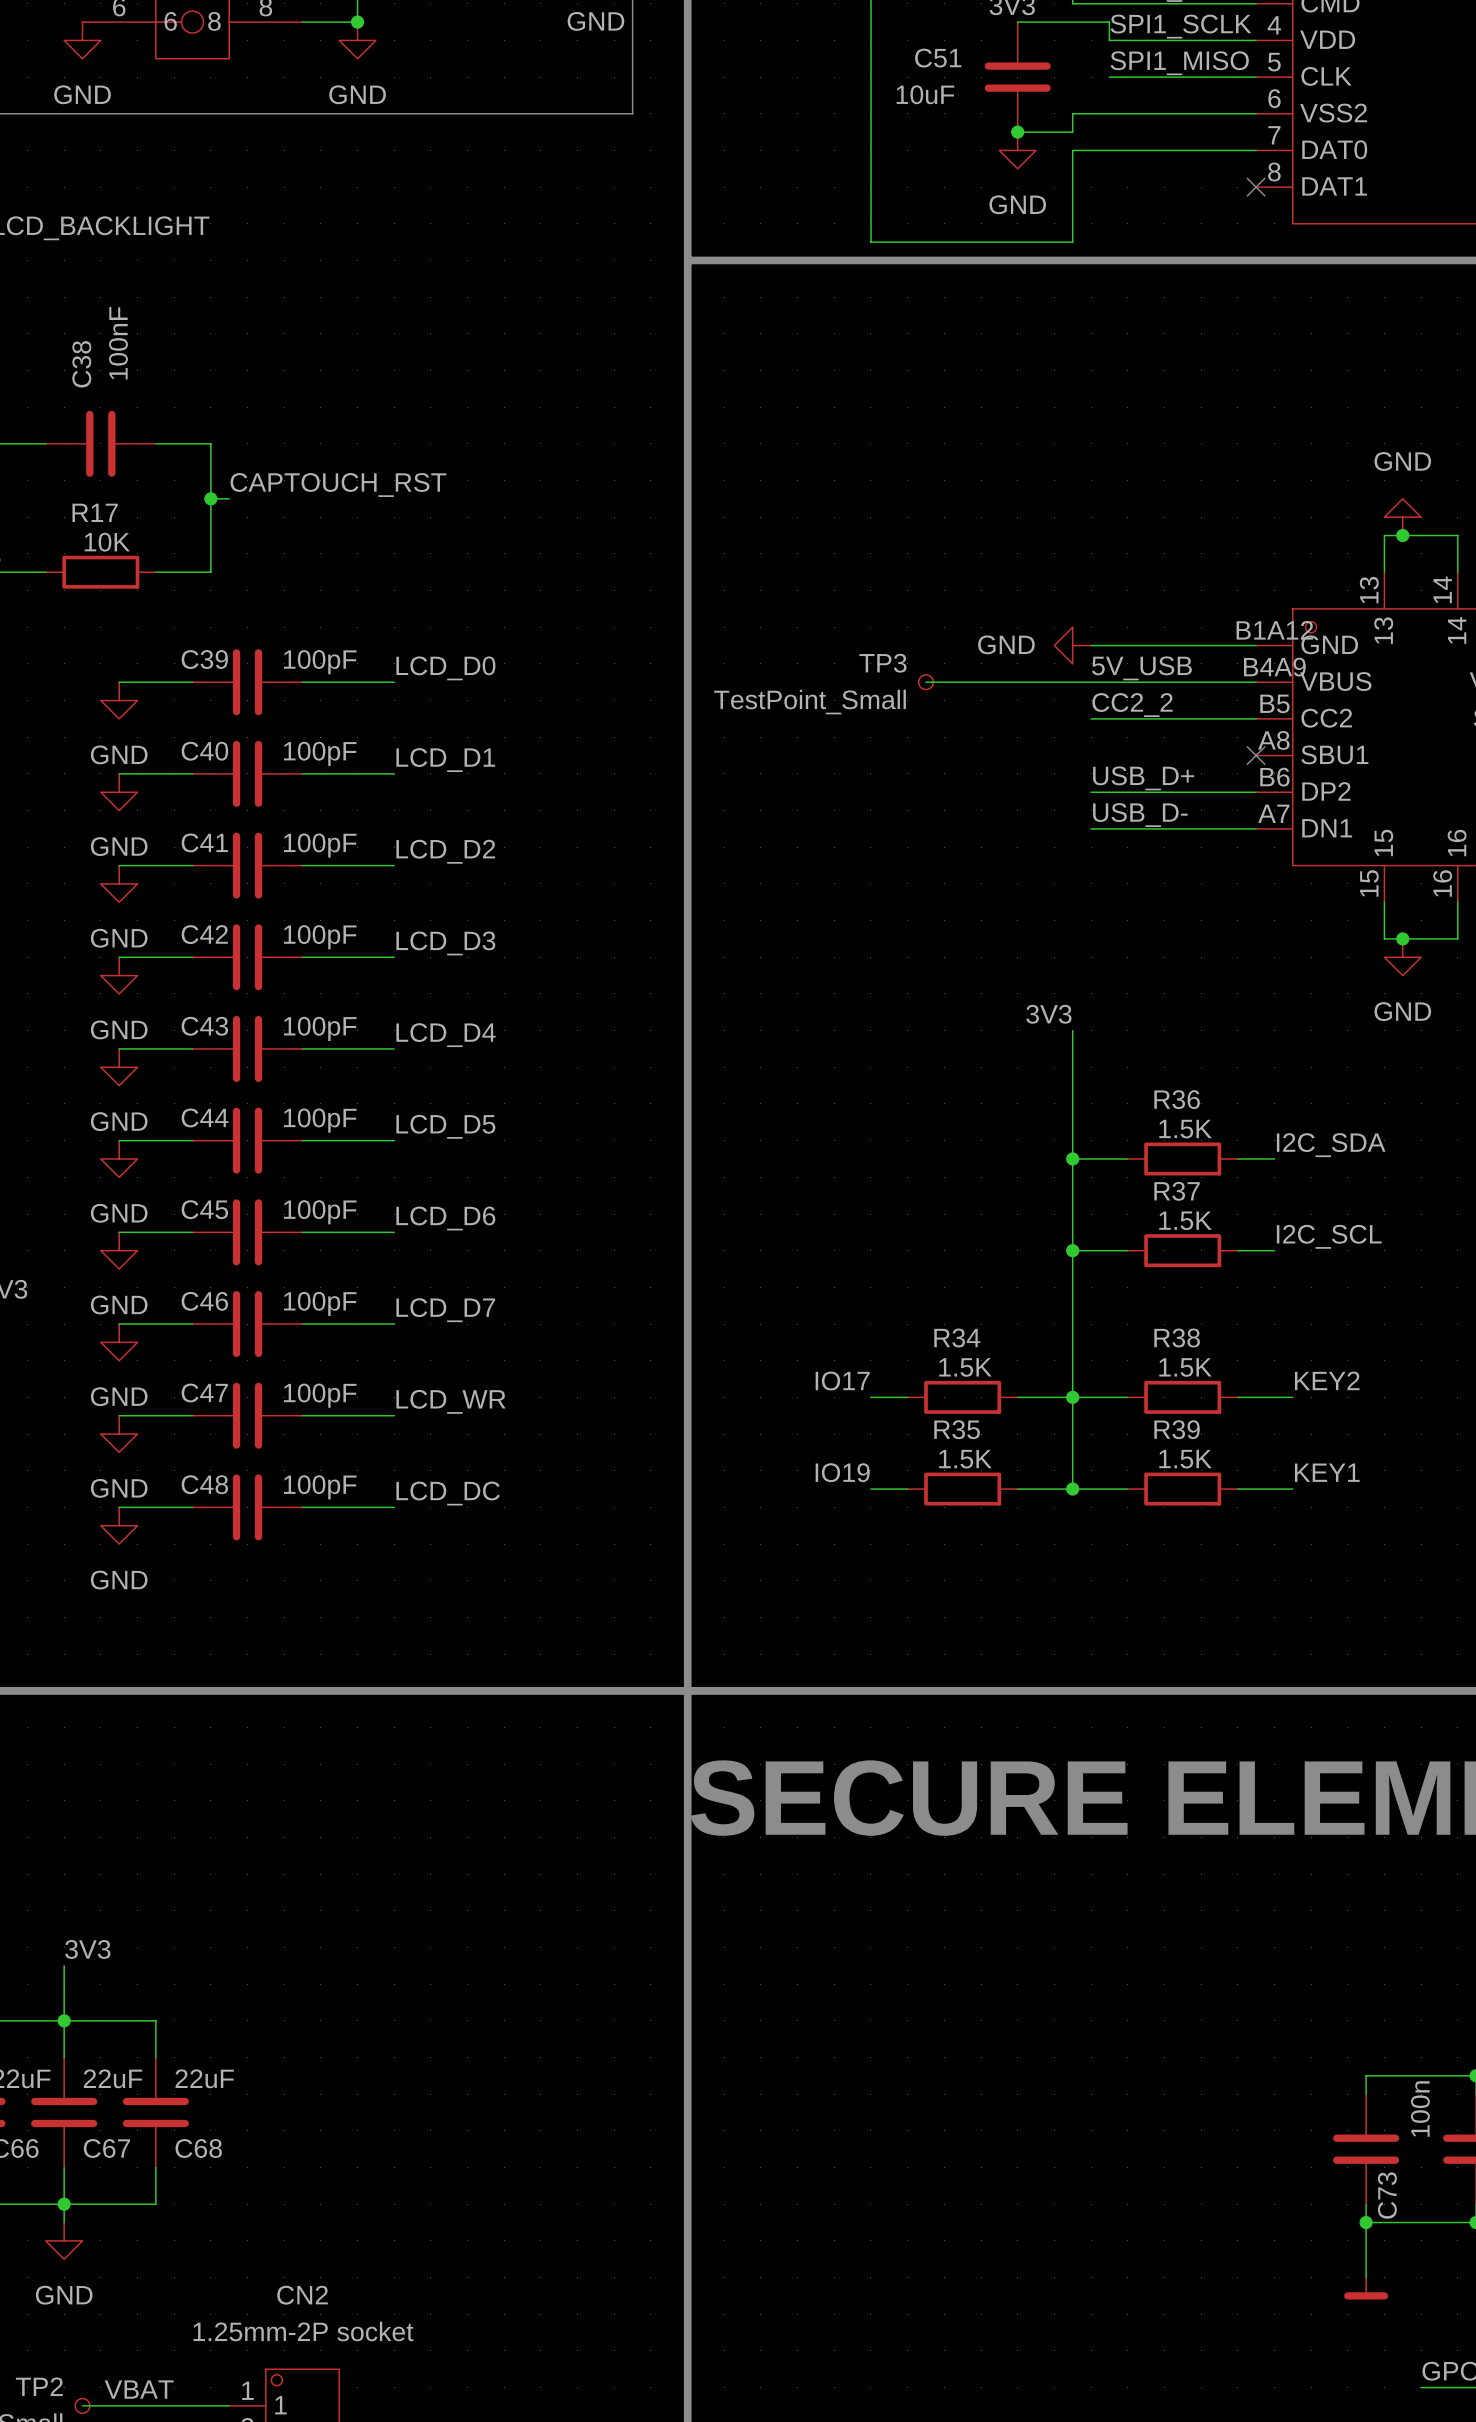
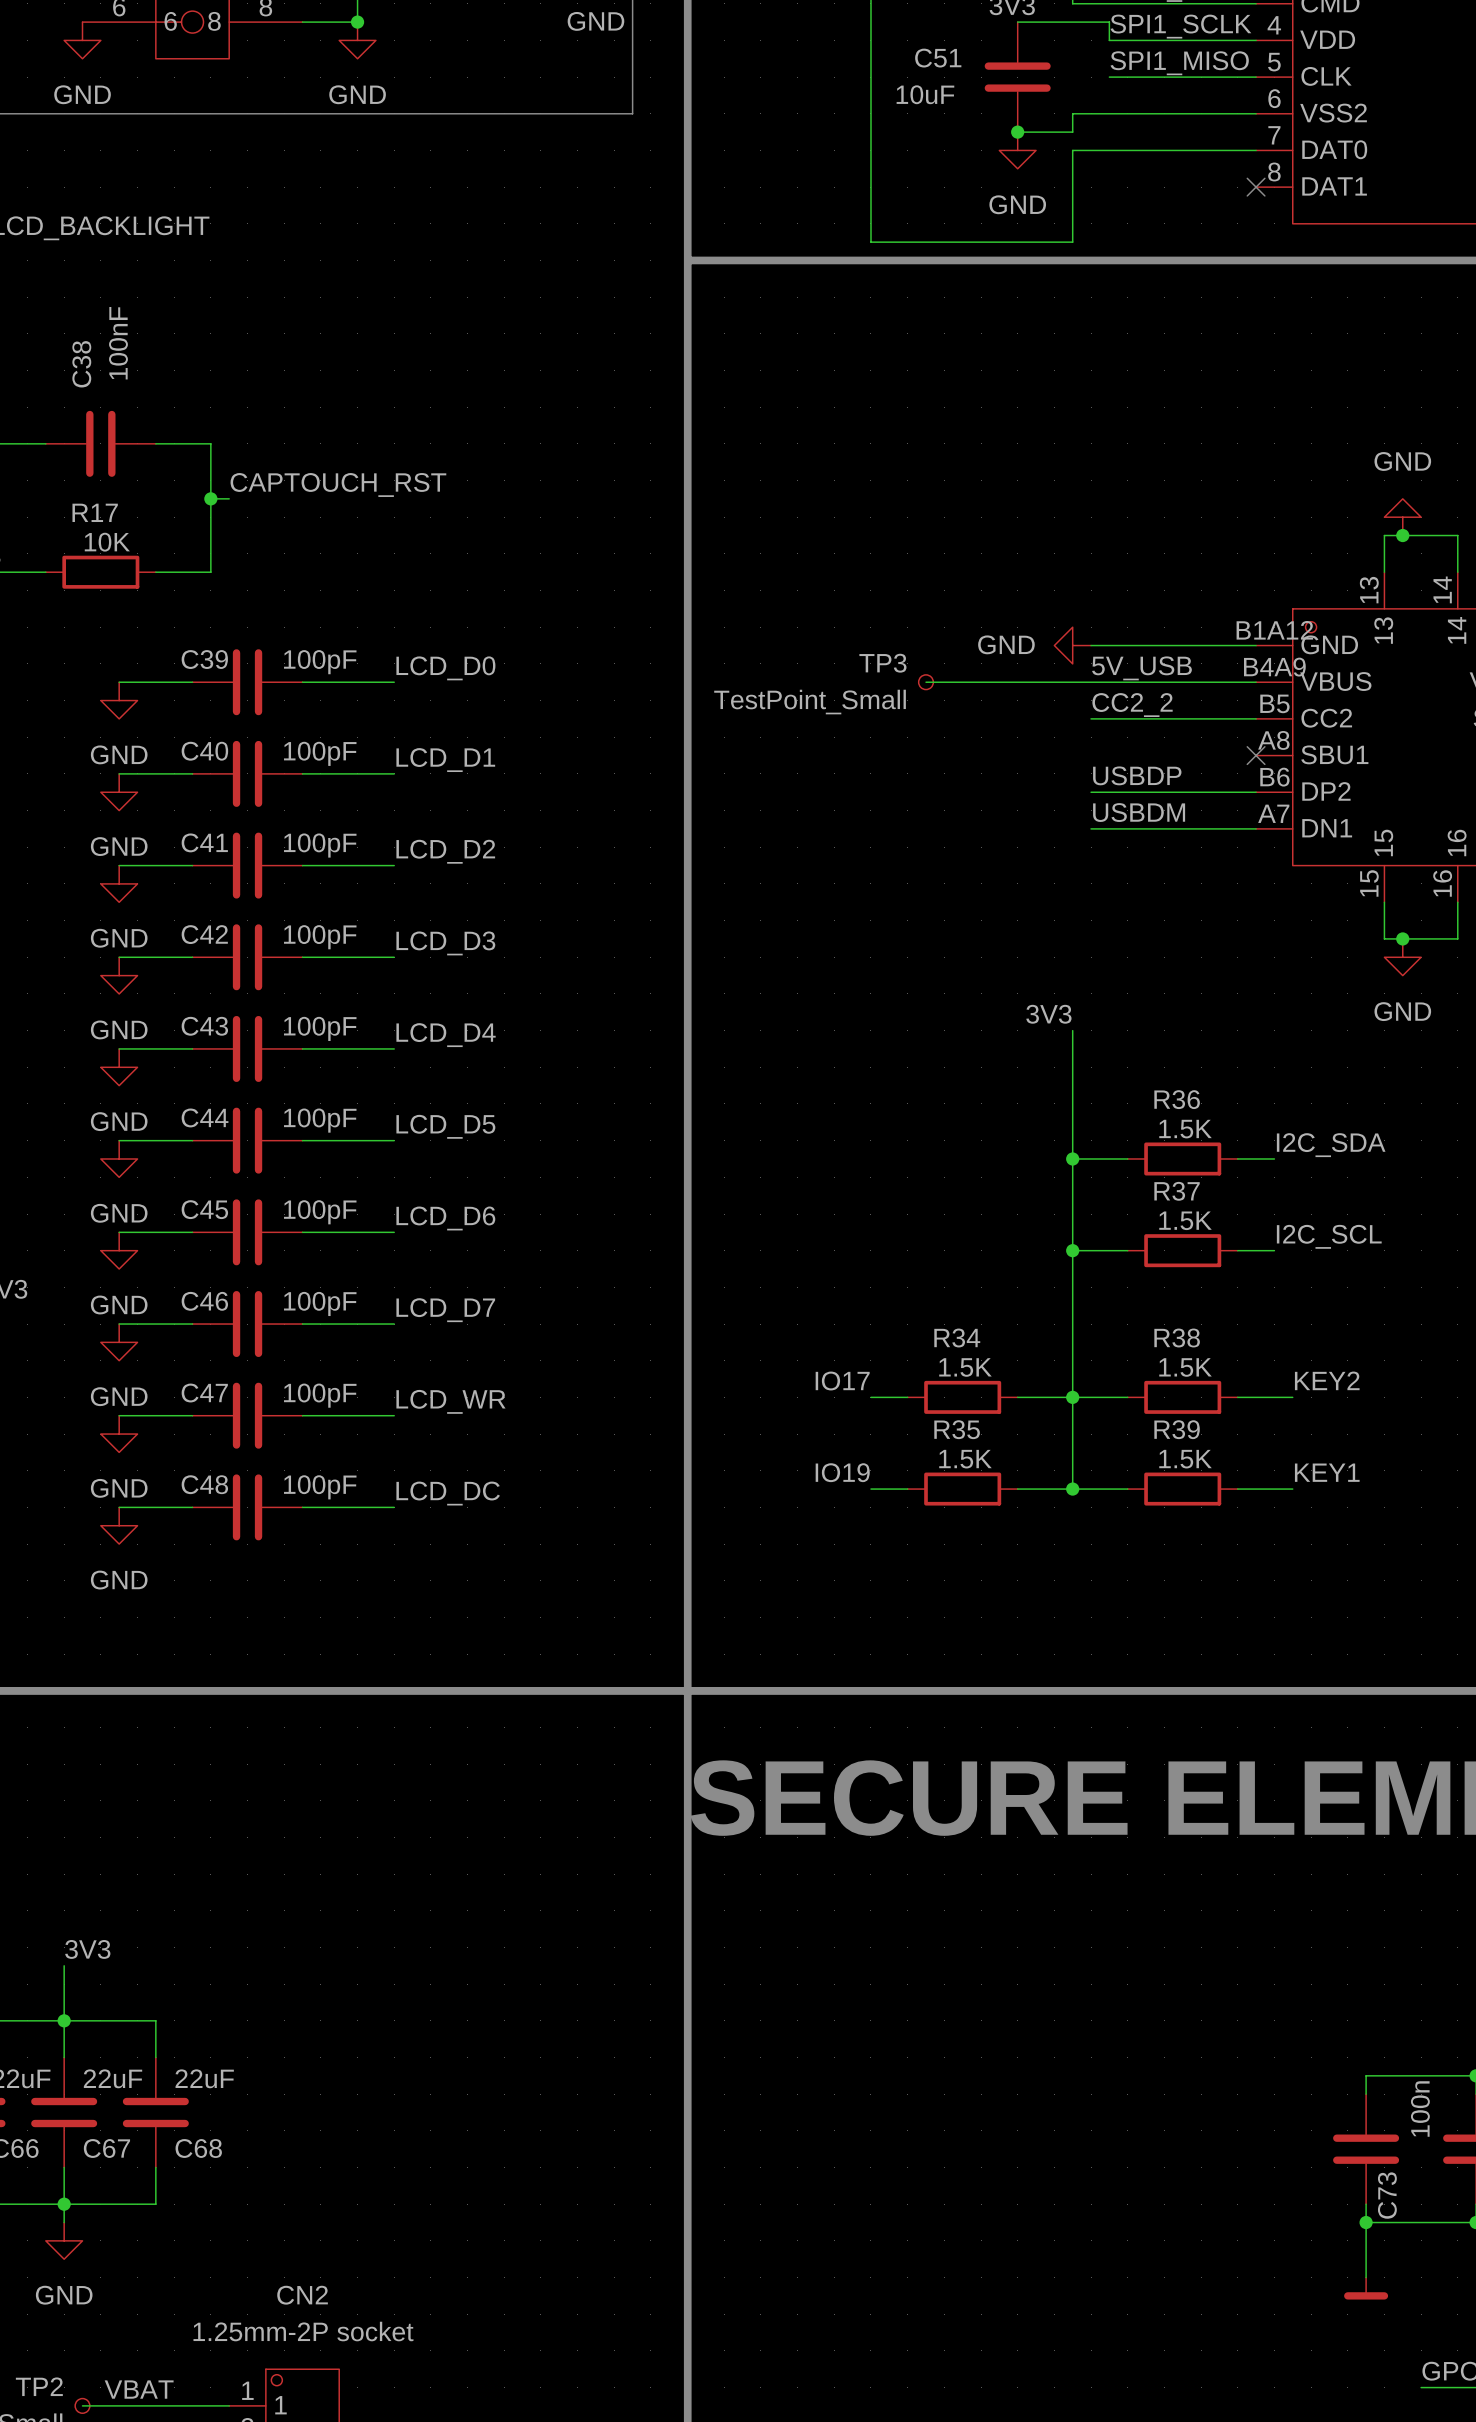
label: USB_D+ (1143, 778) -> USBDP (1137, 775)
label: USB_D- (1140, 815) -> USBDM (1139, 812)

